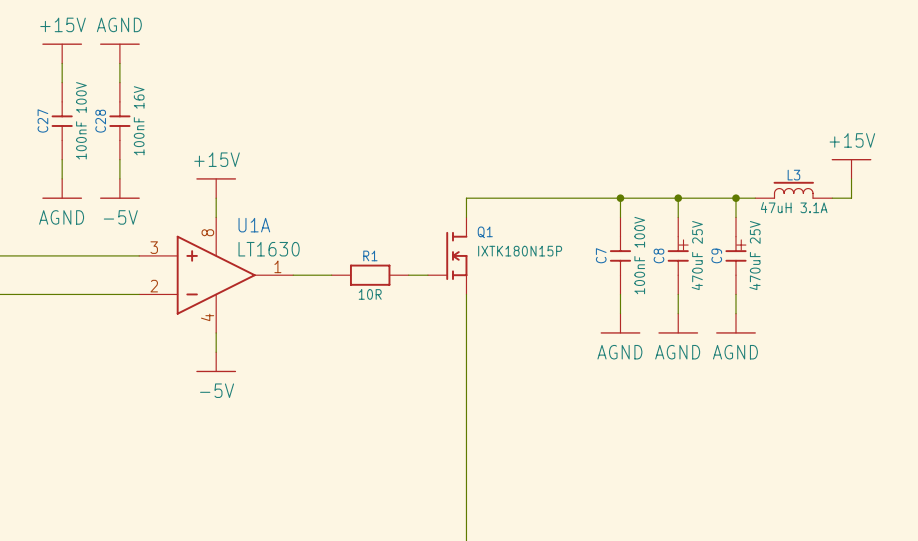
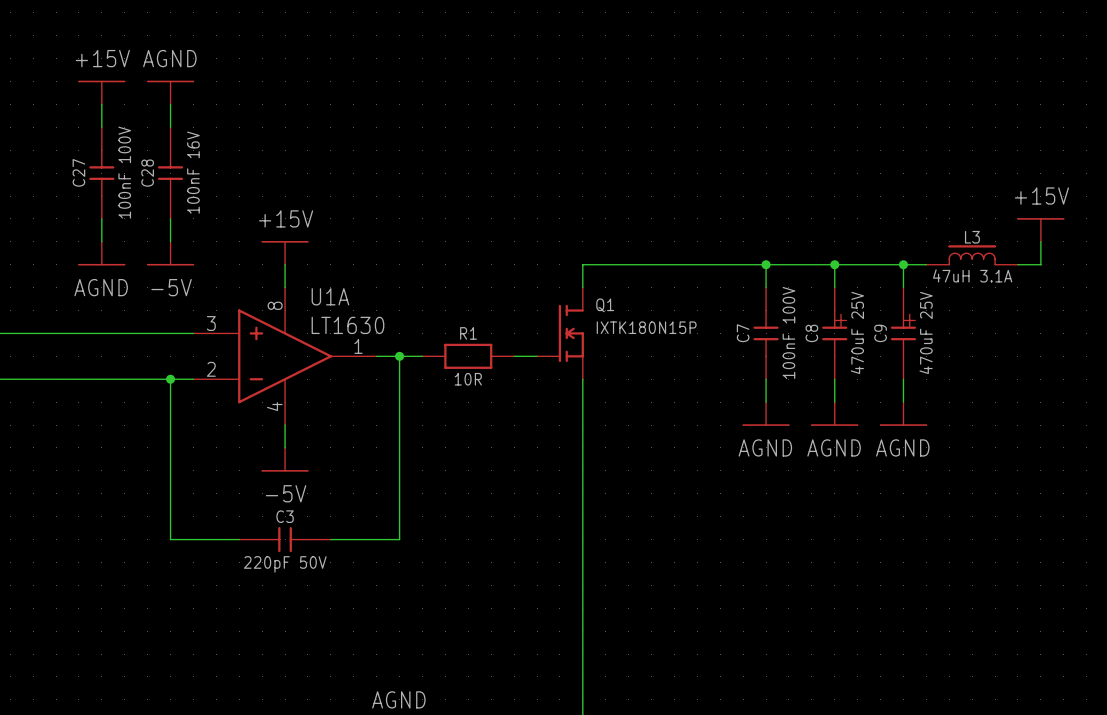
wire: none -> (399, 356) (399, 539) (330, 539)
junction: none -> (399, 356)
wire: none -> (170, 379) (170, 539) (239, 539)
junction: none -> (170, 379)
C3: none -> 220pF 50V (285, 539)

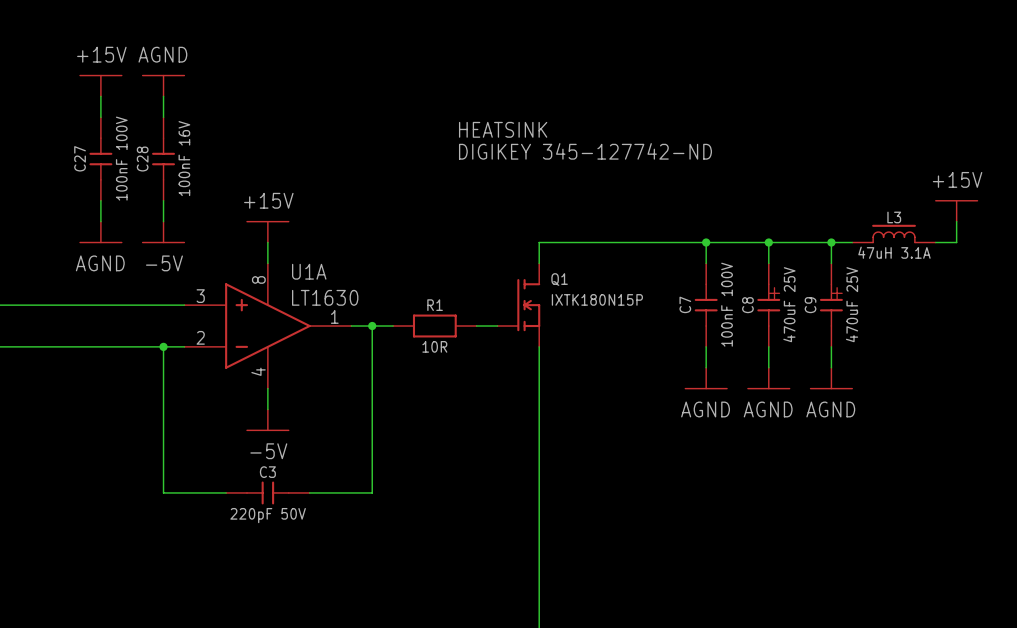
text: none -> HEATSINK (503, 129)
text: none -> DIGIKEY 345-127742-ND (585, 151)

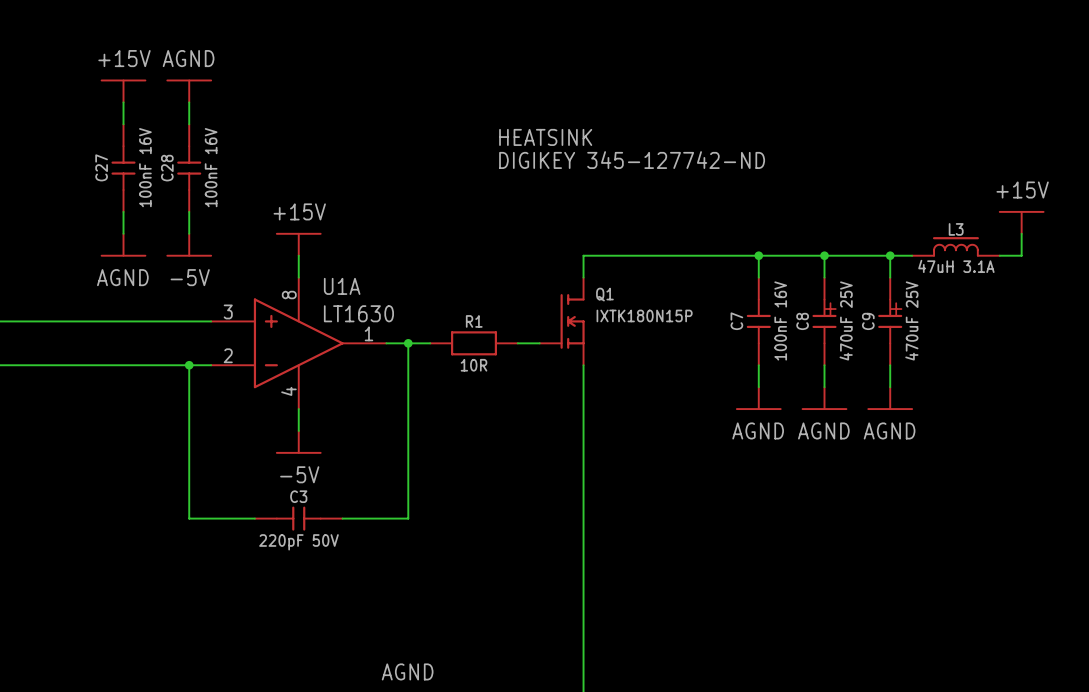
C27 value: 100nF 100V (121, 158) -> 100nF 16V (145, 167)
C7 value: 100nF 100V (727, 304) -> 100nF 16V (780, 320)

